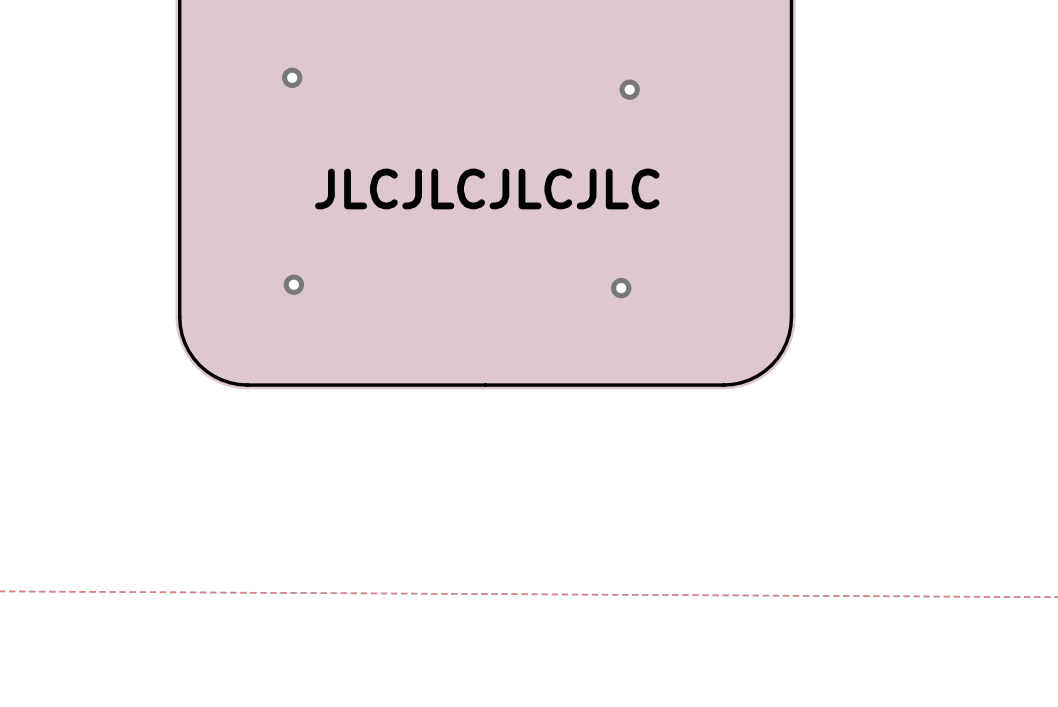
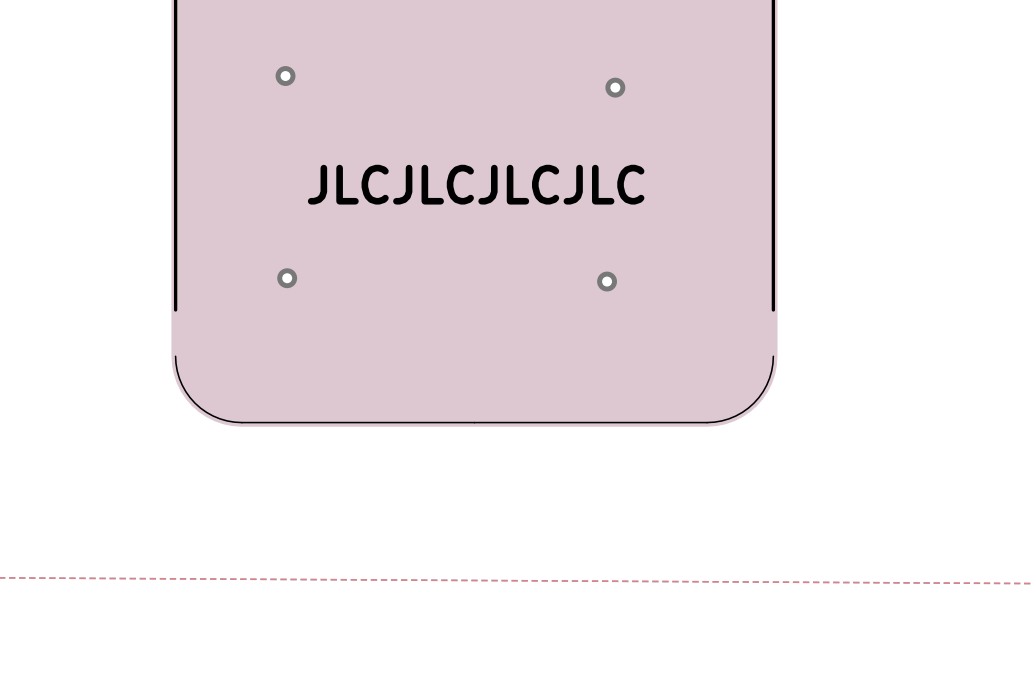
board edge: (179, 317) (184, 343) (199, 365) (221, 379) (247, 385) (732, 384) (757, 375) (777, 358) (789, 334) (791, 317) -> none
board edge: none -> (175, 356) (177, 371) (182, 385) (195, 403) (213, 416) (227, 420) (241, 422) (714, 422) (728, 418) (742, 412) (758, 397) (769, 378) (773, 356)

